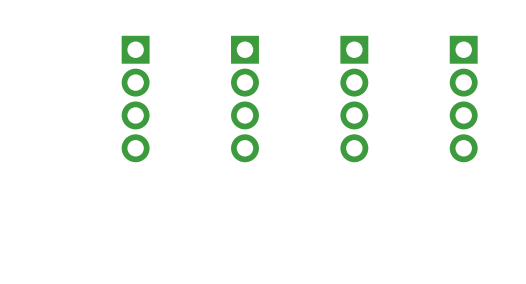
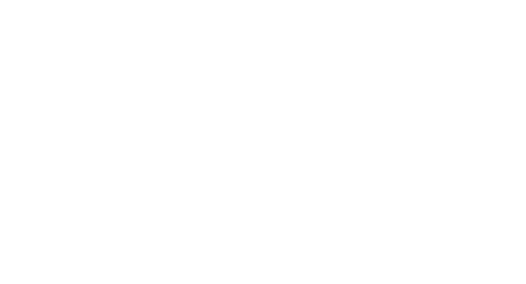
part: (135, 99) -> none
part: (244, 99) -> none
part: (354, 99) -> none
part: (463, 99) -> none

